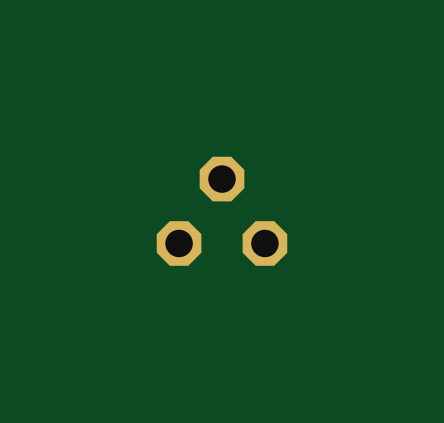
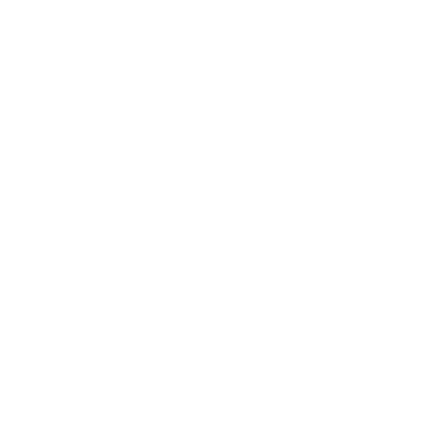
part: (222, 211) -> none

